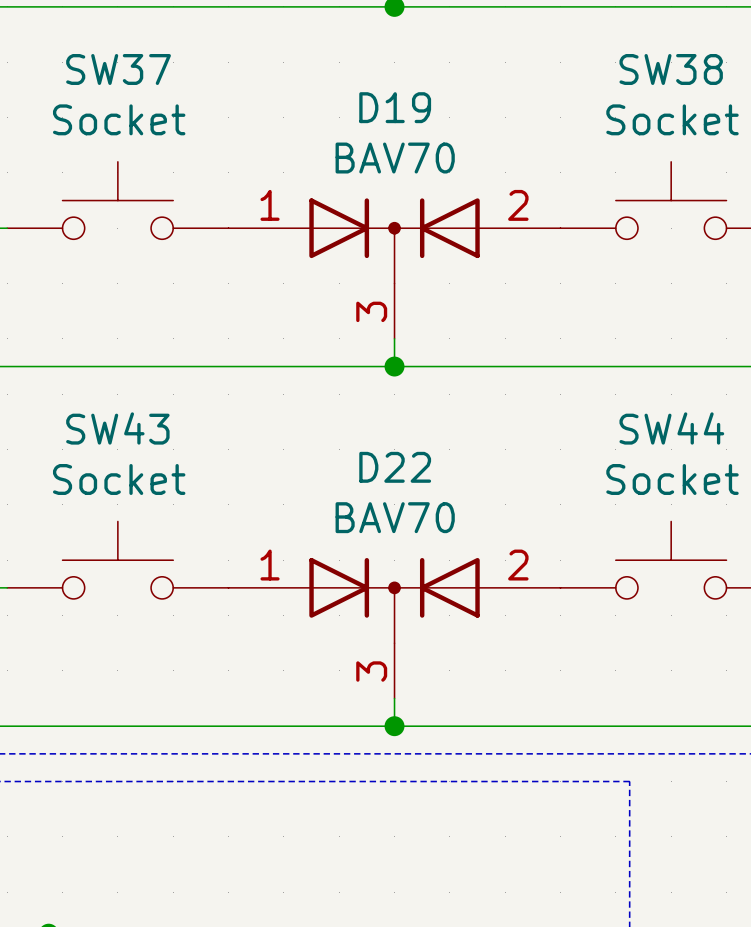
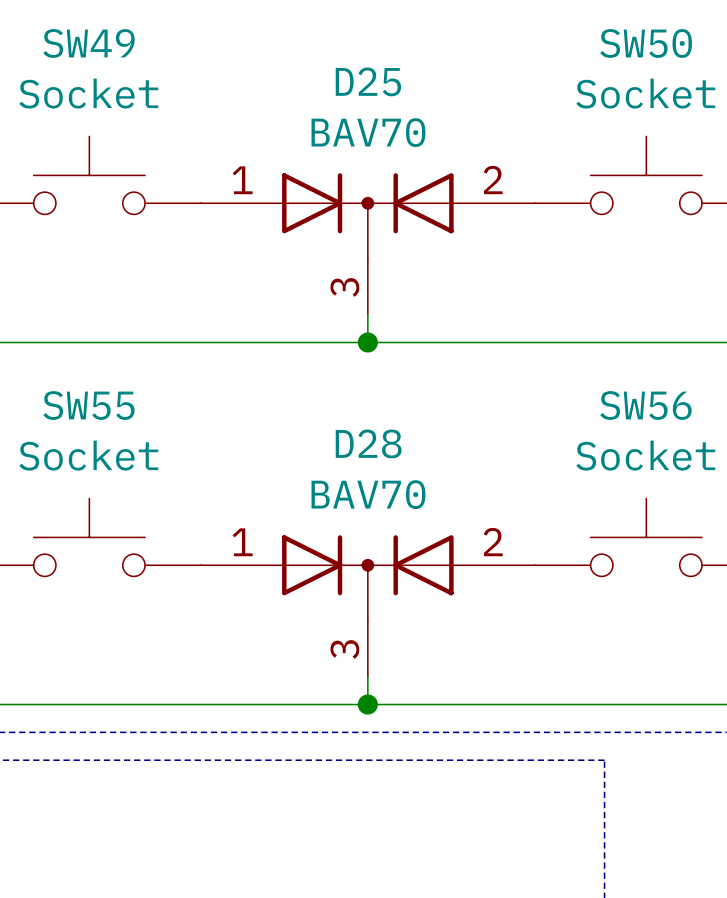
SW37 name: SW37 (118, 69) -> SW49 (88, 43)
SW38 name: SW38 (671, 69) -> SW50 (646, 43)
D19 name: D19 (395, 107) -> D25 (368, 81)
SW43 name: SW43 (117, 428) -> SW55 (88, 405)
SW44 name: SW44 (671, 428) -> SW56 (645, 405)
D22 name: D22 (395, 467) -> D28 (368, 443)

